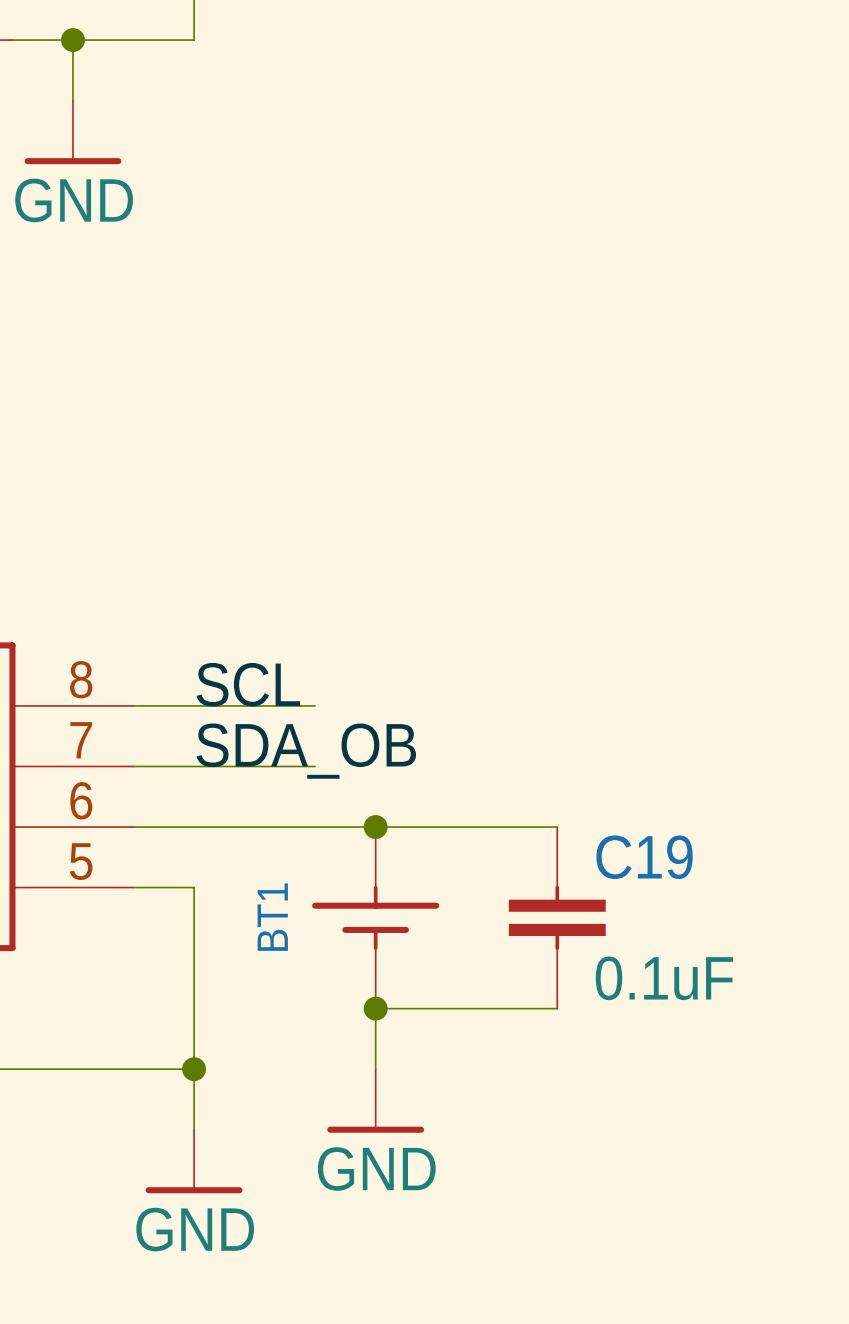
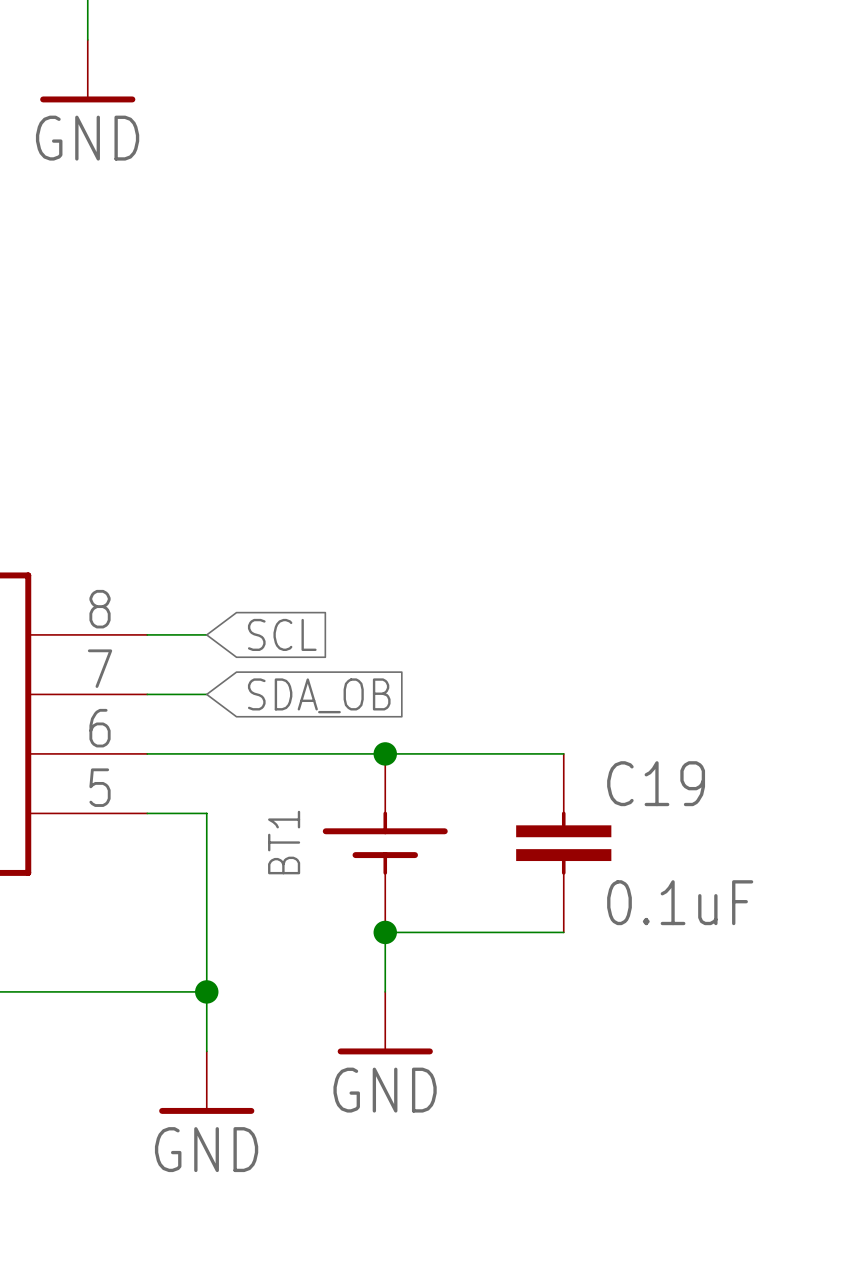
label: SCL (248, 684) -> none
wire: (194, 705) (315, 705) -> none
global label: none -> SCL (282, 634)
label: SDA_OB (306, 751) -> none
wire: (194, 766) (315, 766) -> none
global label: none -> SDA_OB (319, 695)

